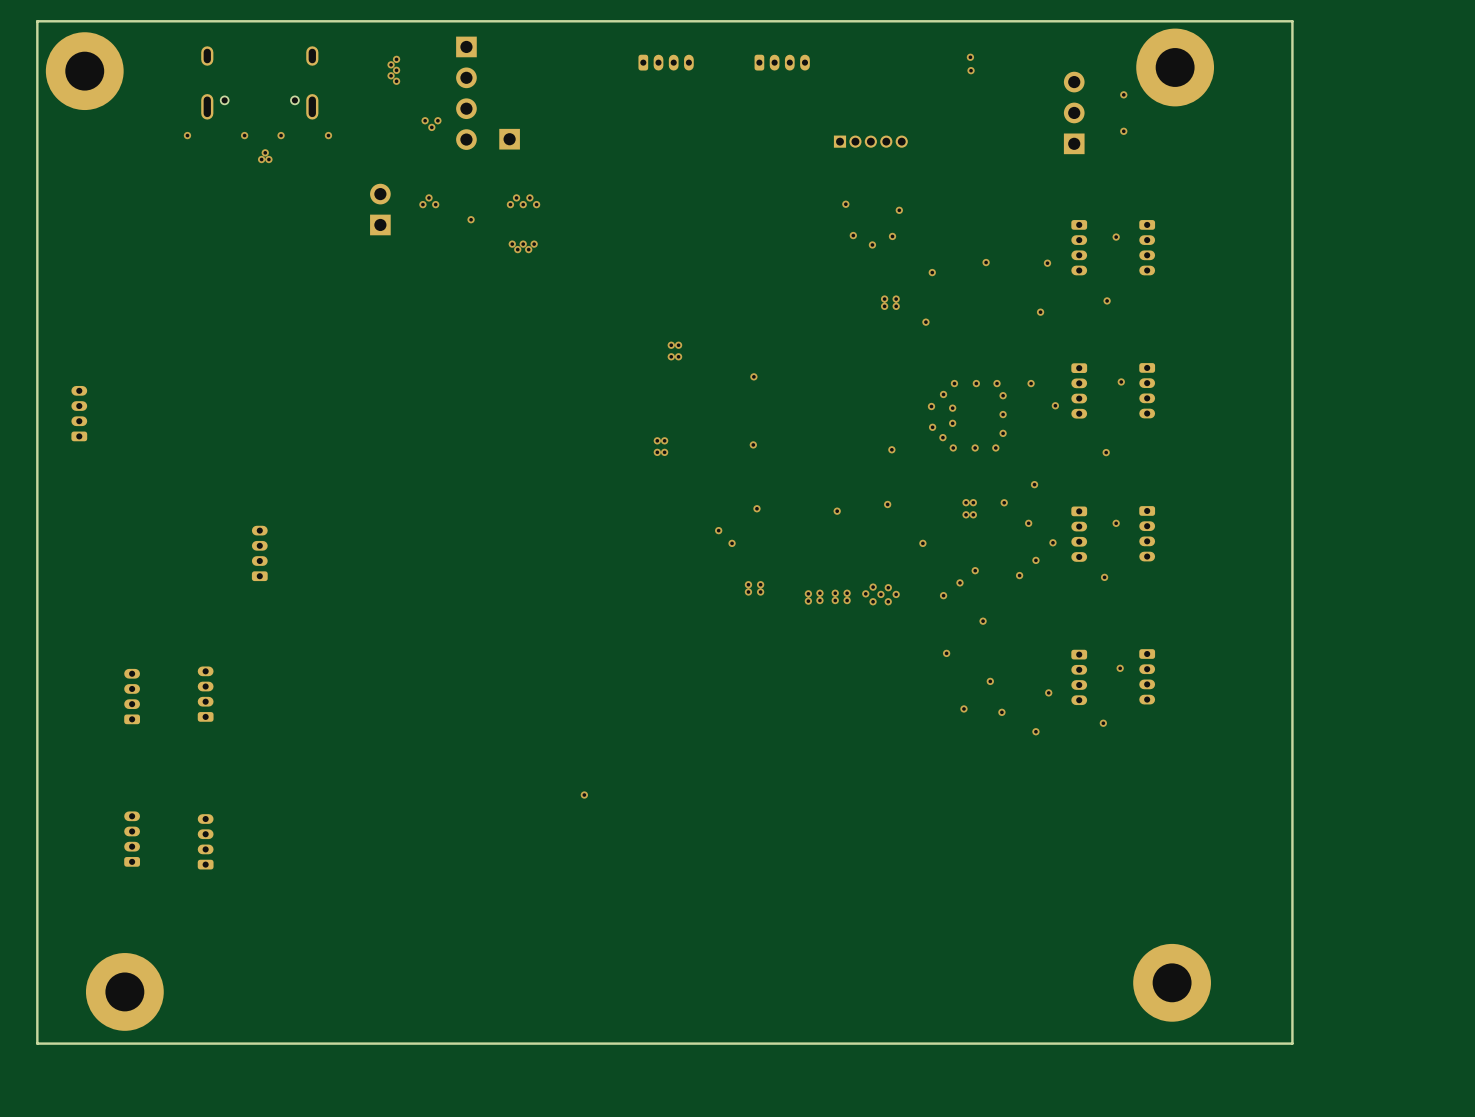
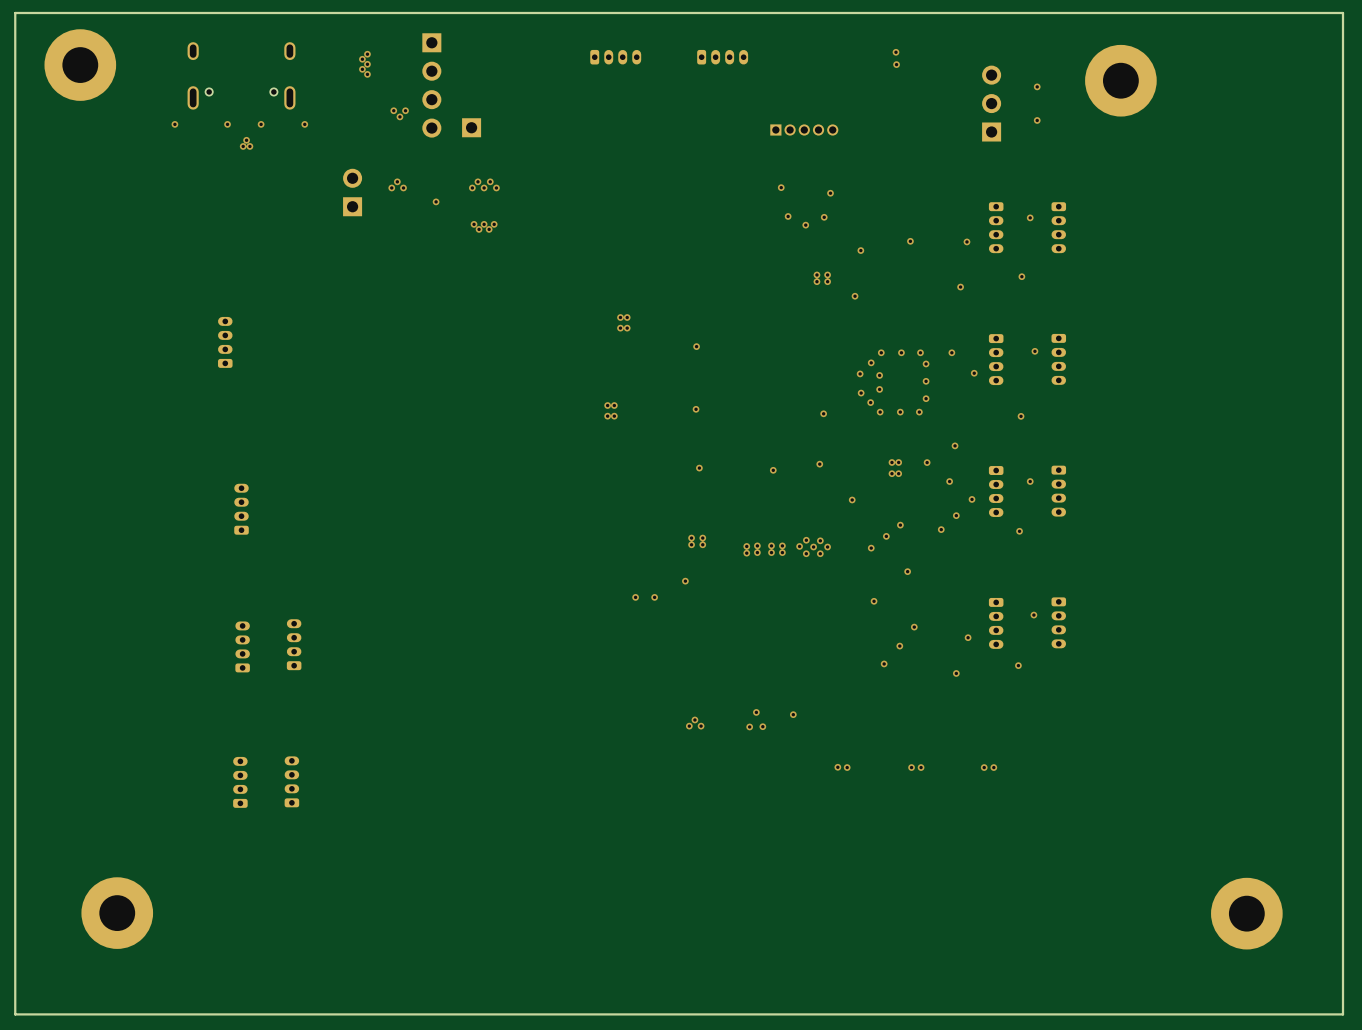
board edge: (1292, 21) (37, 21) (37, 1043) (1292, 1043) (1292, 21) -> (1343, 12) (1343, 1014) (15, 1014) (15, 12) (1343, 12)
part position: (1175, 67) -> (1120, 80)
part: none -> (225, 342)
part: (79, 413) -> none
via: (718, 530) -> none
via: (732, 543) -> none
via: none -> (685, 581)
via: none -> (635, 597)
via: none -> (654, 597)
part: (205, 694) -> none
part: (132, 696) -> none
part: none -> (294, 644)
part: none -> (242, 646)
via: none -> (899, 646)
via: (963, 708) -> none
via: (1001, 712) -> none
via: none -> (884, 663)
via: none -> (756, 712)
via: none -> (793, 714)
via: none -> (694, 719)
via: none -> (689, 726)
via: none -> (701, 726)
via: none -> (749, 726)
via: none -> (762, 726)
via: (584, 795) -> none
via: none -> (837, 767)
via: none -> (847, 767)
via: none -> (911, 767)
via: none -> (921, 767)
via: none -> (984, 767)
via: none -> (993, 767)
part: (132, 839) -> none
part position: (205, 841) -> (240, 782)
part: none -> (291, 781)
part position: (1172, 982) -> (1246, 913)

